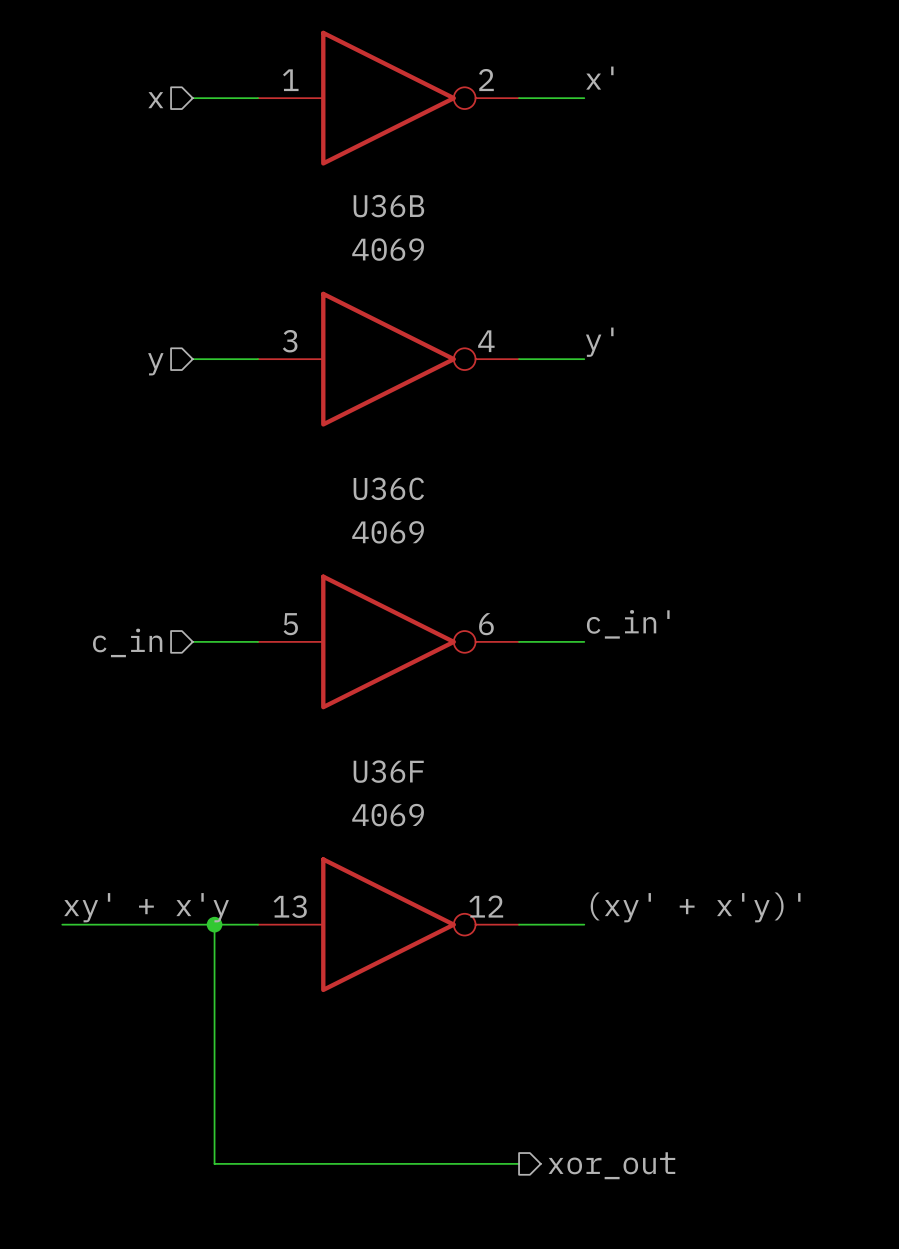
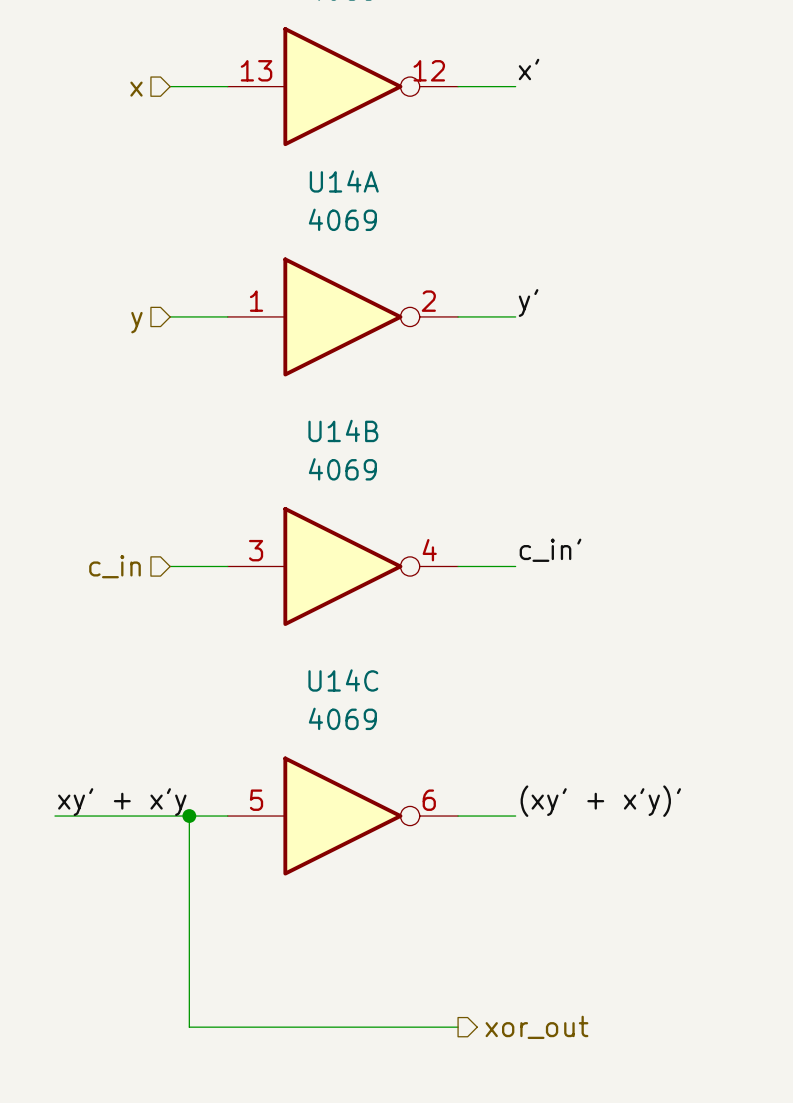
part pin number: 1 (290, 80) -> 13 (256, 70)
part pin number: 2 (486, 80) -> 12 (429, 70)
U36B name: U36B (388, 206) -> U14A (344, 181)
U36B pin number: 3 (290, 341) -> 1 (256, 301)
U36B pin number: 4 (486, 341) -> 2 (428, 301)
U36C name: U36C (388, 488) -> U14B (343, 430)
U36C pin number: 5 (290, 624) -> 3 (256, 550)
U36C pin number: 6 (486, 624) -> 4 (429, 550)
U36F name: U36F (388, 771) -> U14C (343, 680)
U36F pin number: 13 (290, 906) -> 5 (256, 800)
U36F pin number: 12 (486, 906) -> 6 (429, 800)

